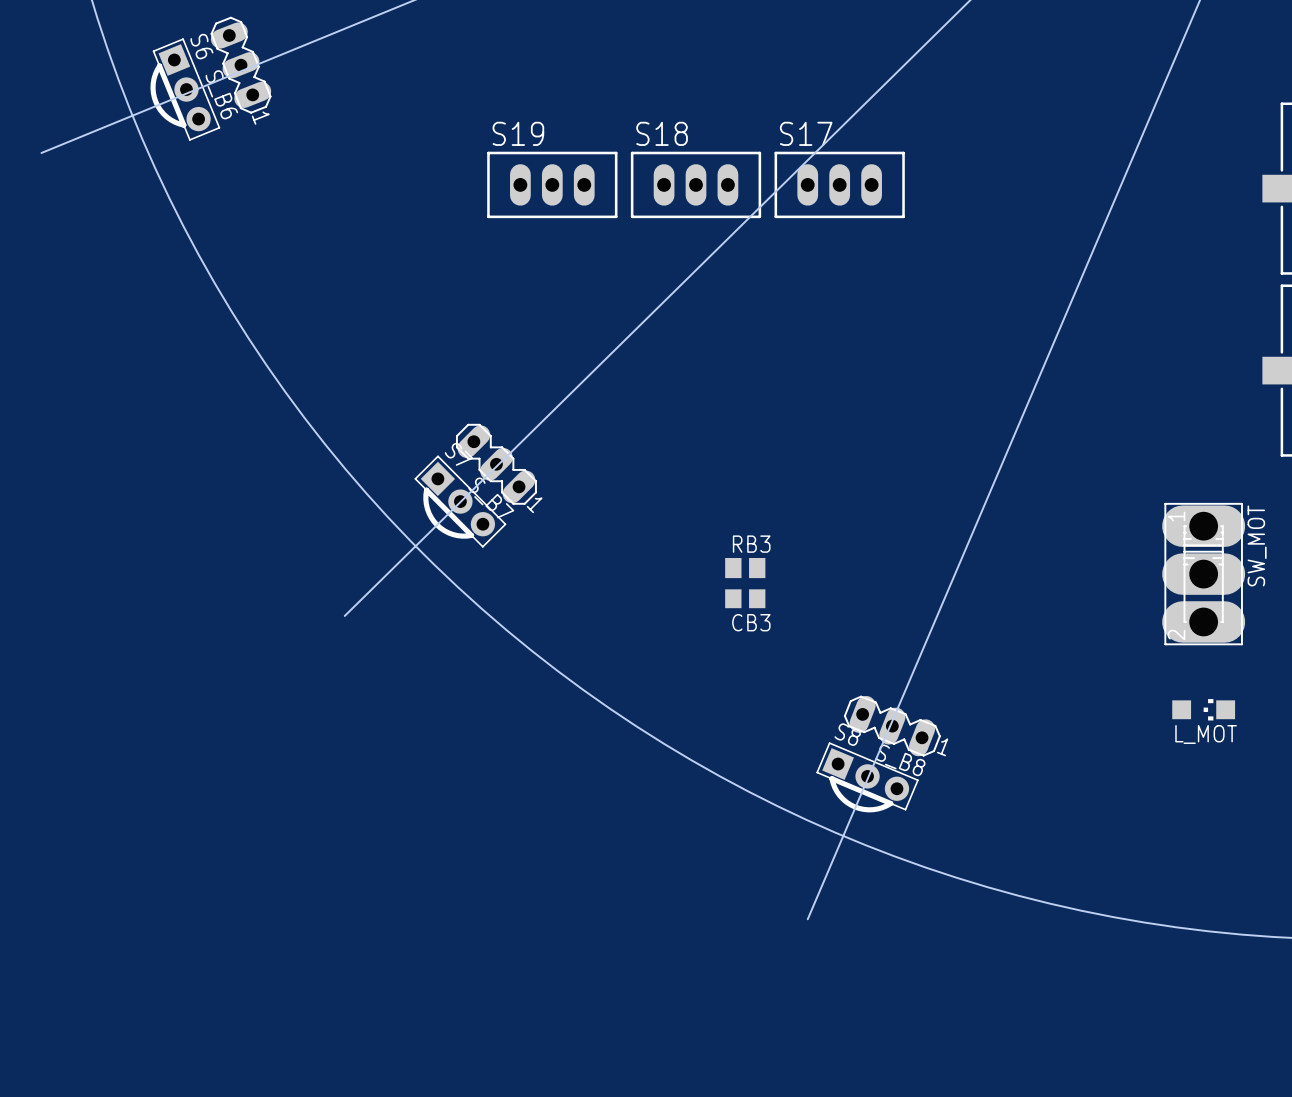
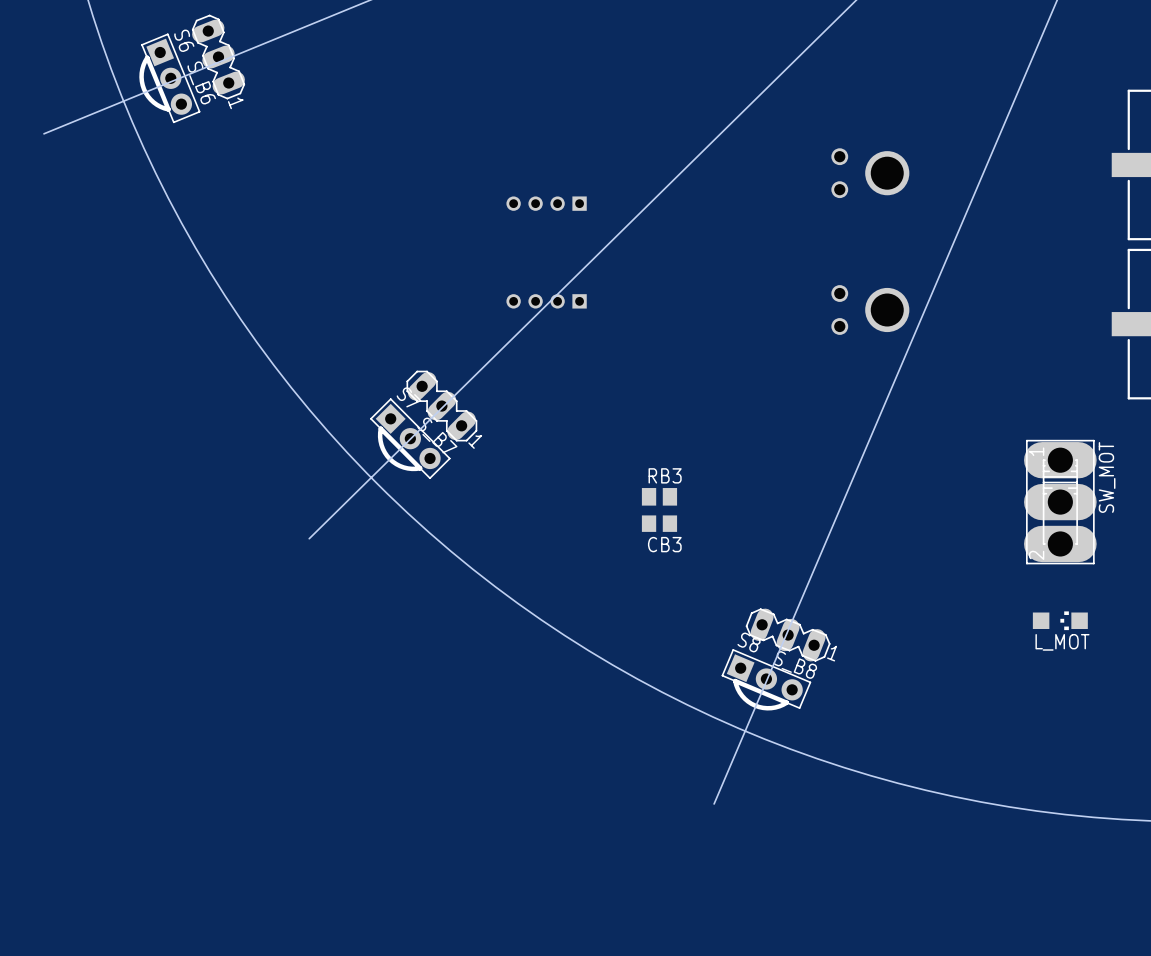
S19: (552, 184) -> none
S18: (696, 184) -> none
S17: (839, 184) -> none
part: none -> (870, 173)
part: none -> (546, 203)
part: none -> (546, 301)
part: none -> (870, 310)

